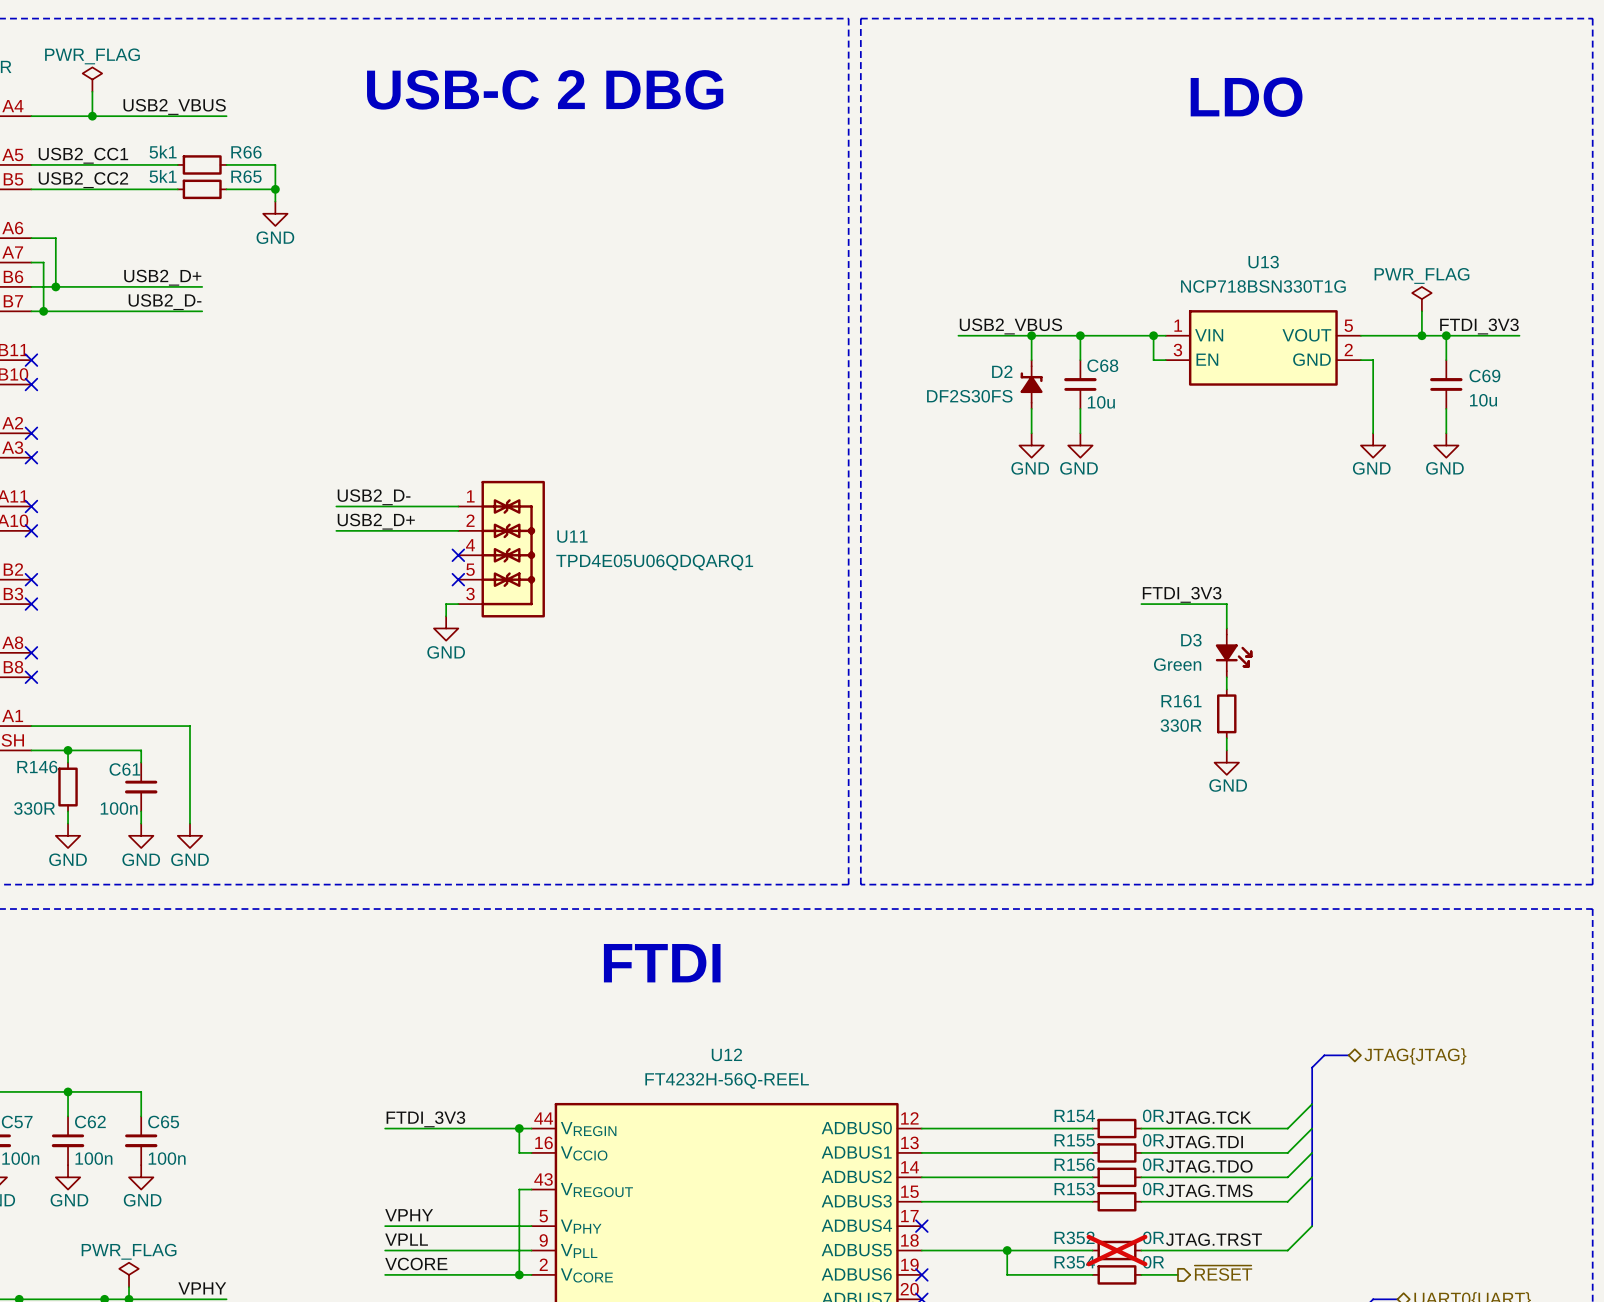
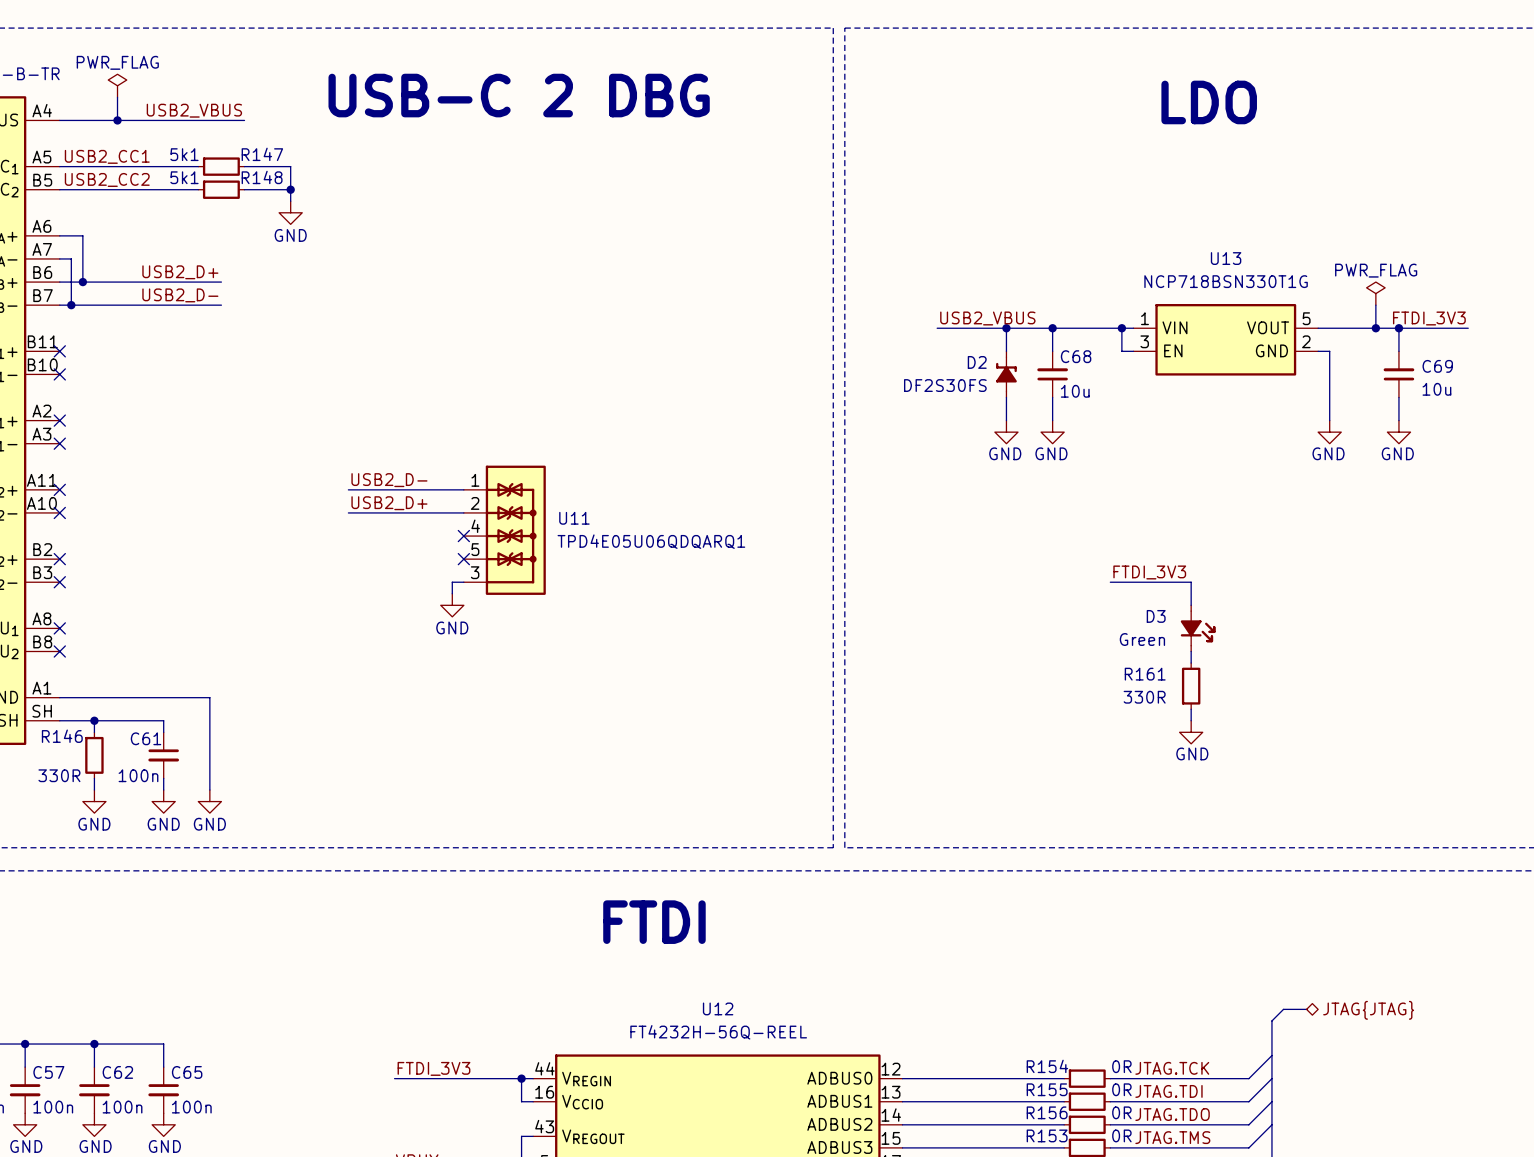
R66 name: R66 (246, 152) -> R147 (262, 154)
R65 name: R65 (246, 176) -> R148 (262, 177)

